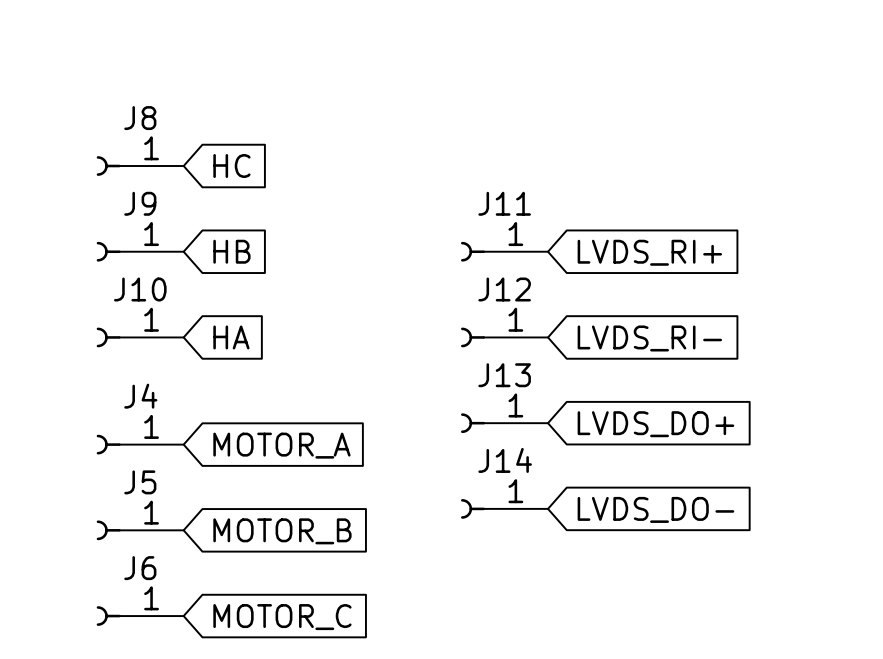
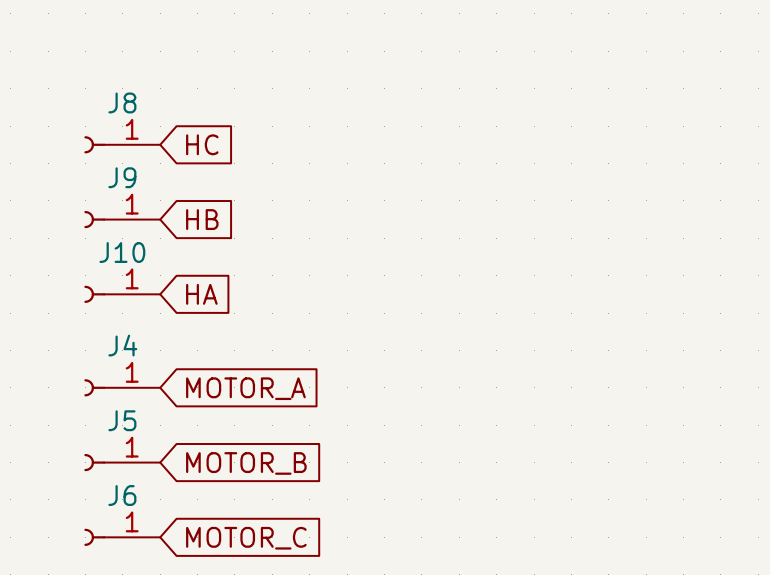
J11: (504, 251) -> none
global label: LVDS_RI+ (649, 252) -> none
J12: (504, 337) -> none
global label: LVDS_RI- (649, 338) -> none
J13: (504, 423) -> none
global label: LVDS_DO+ (655, 424) -> none
J14: (504, 508) -> none
global label: LVDS_DO- (655, 509) -> none

